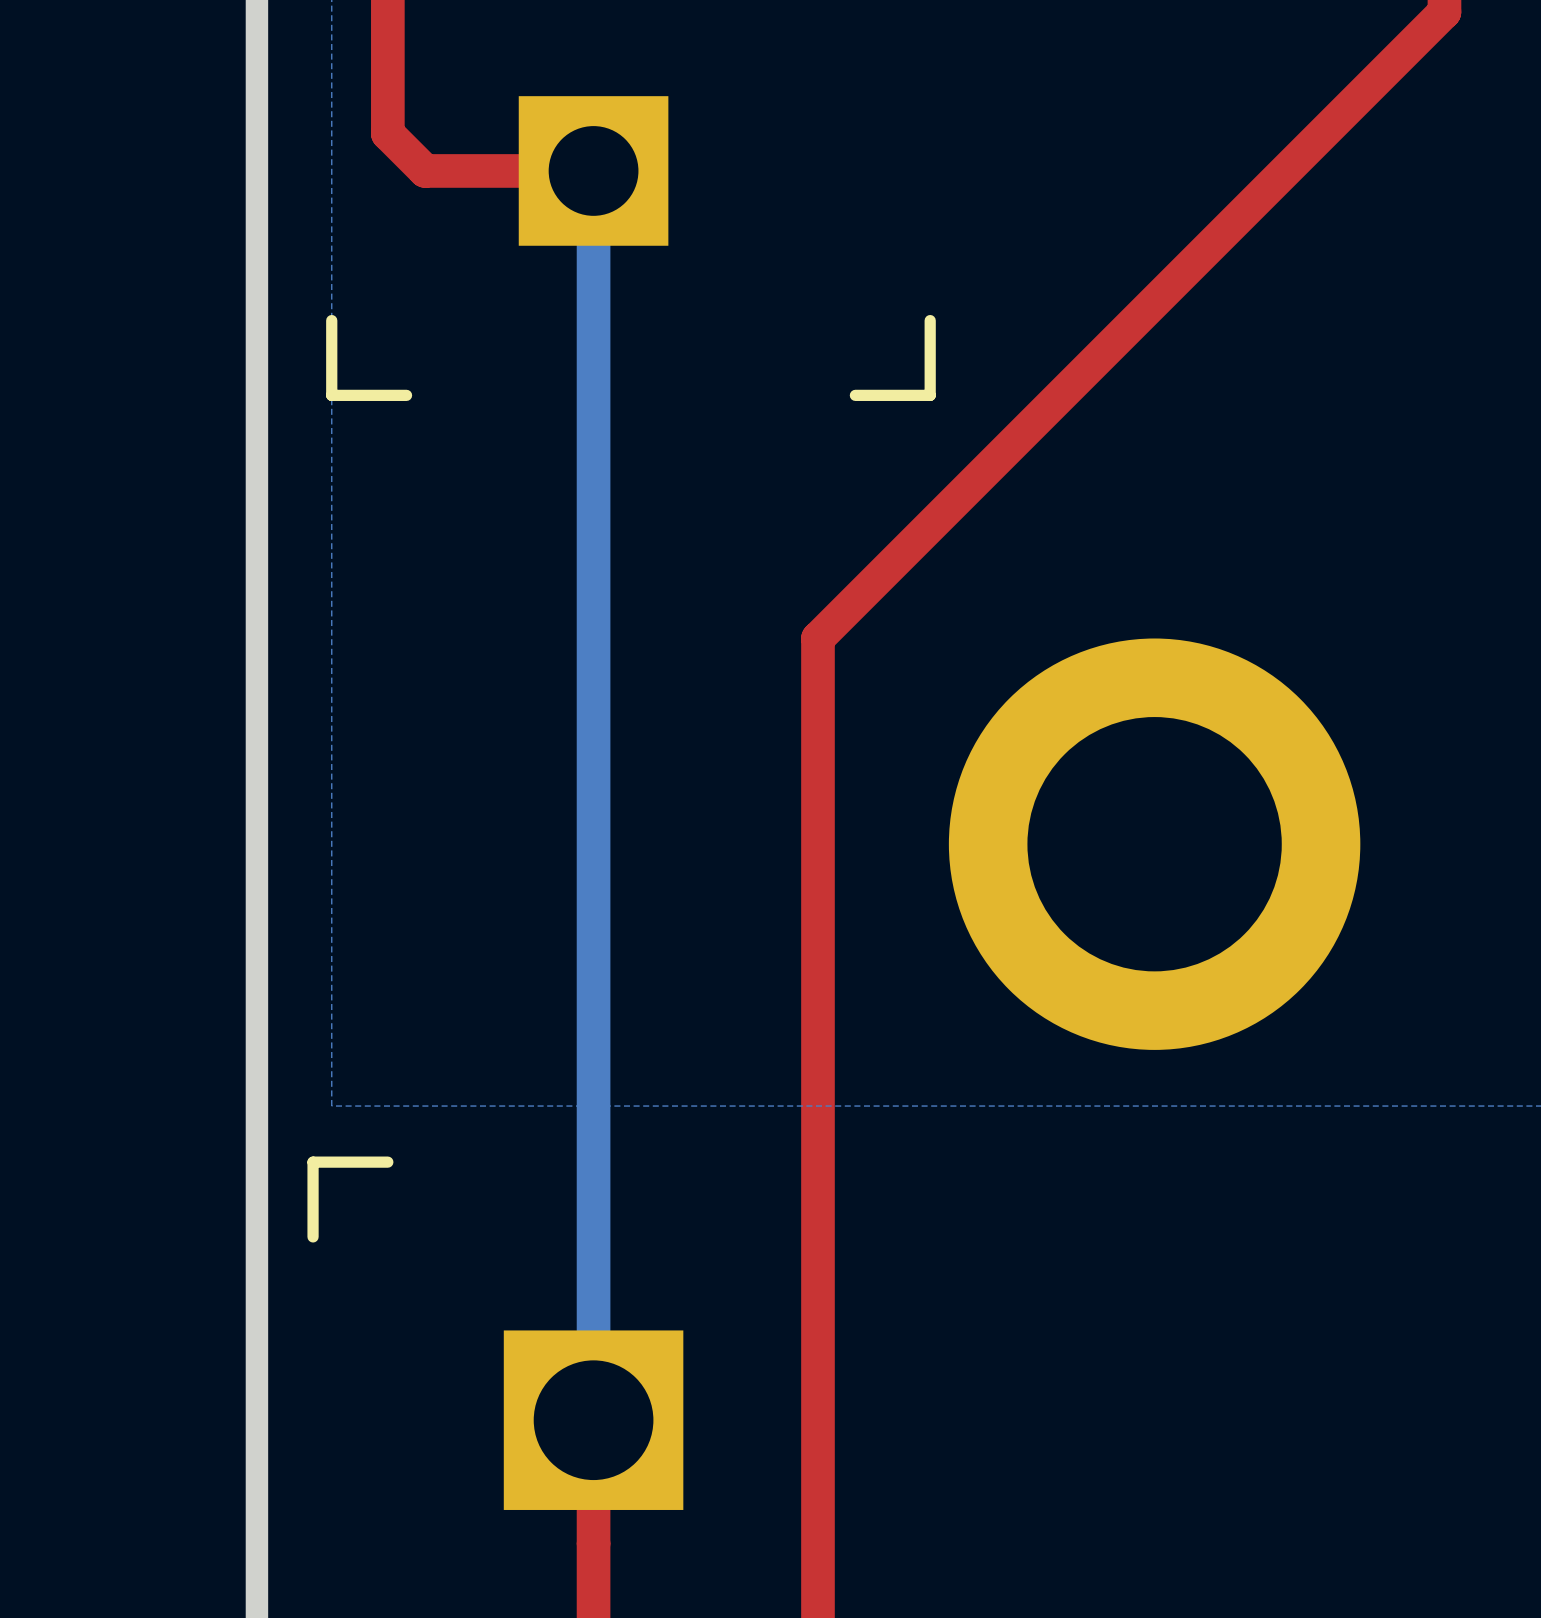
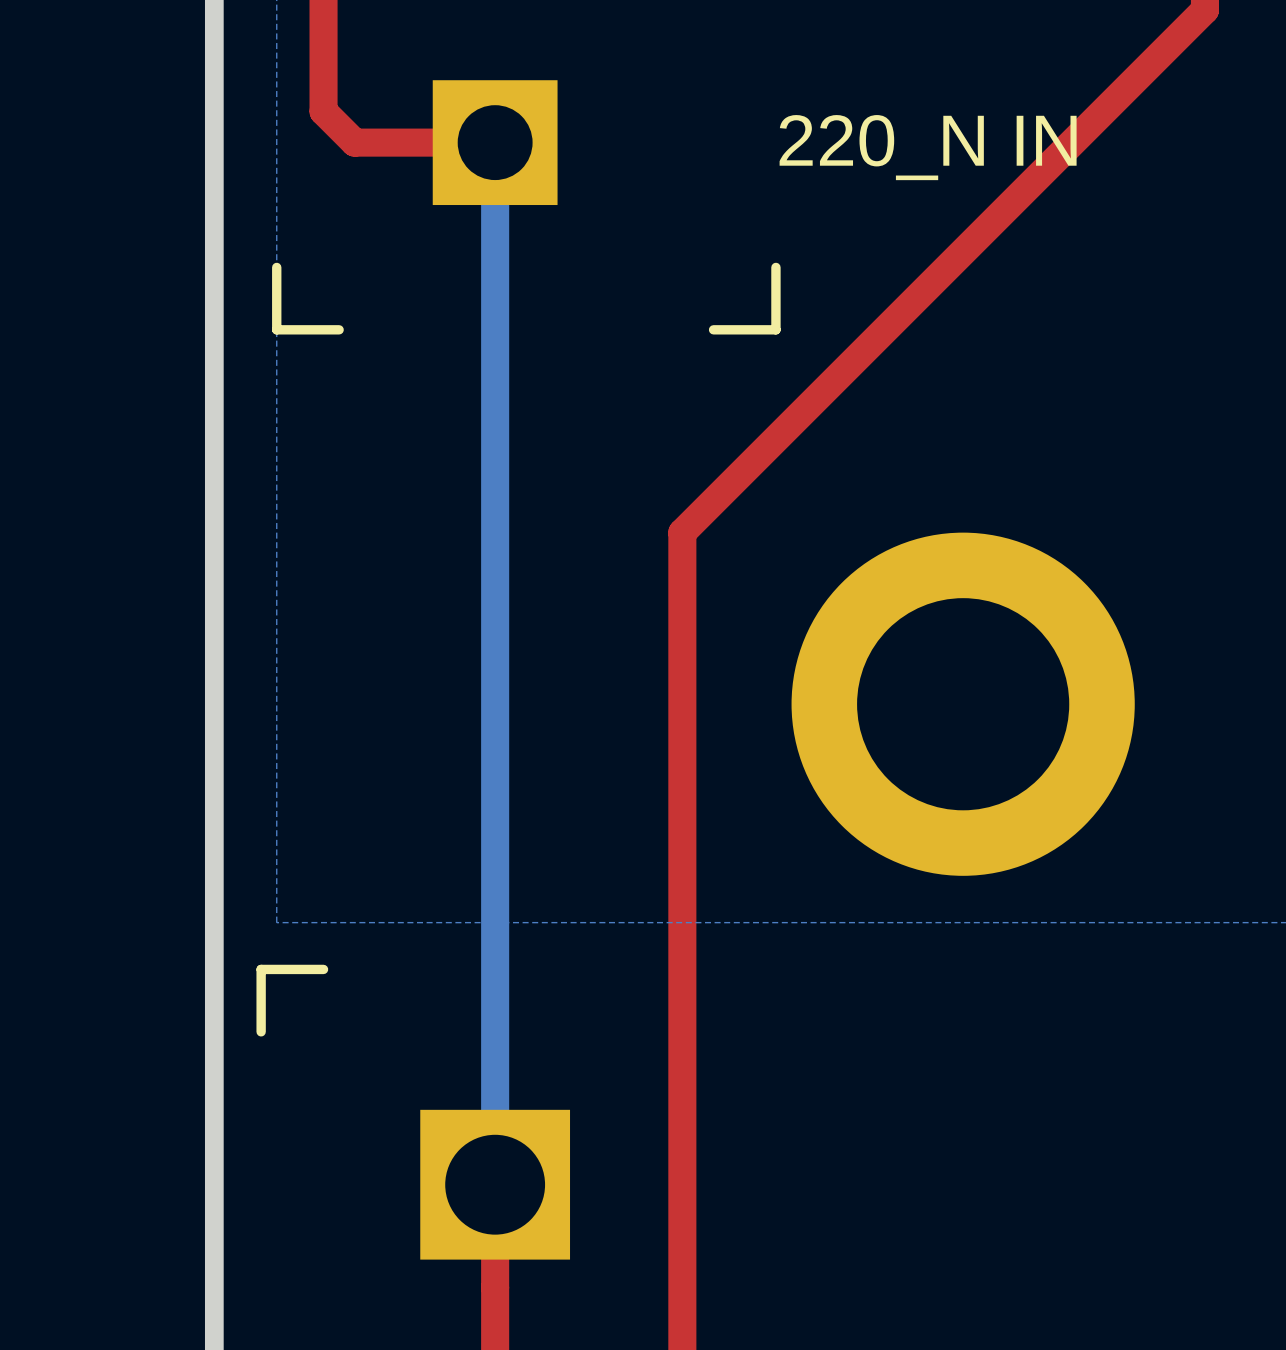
text: none -> 220_N IN (928, 147)

